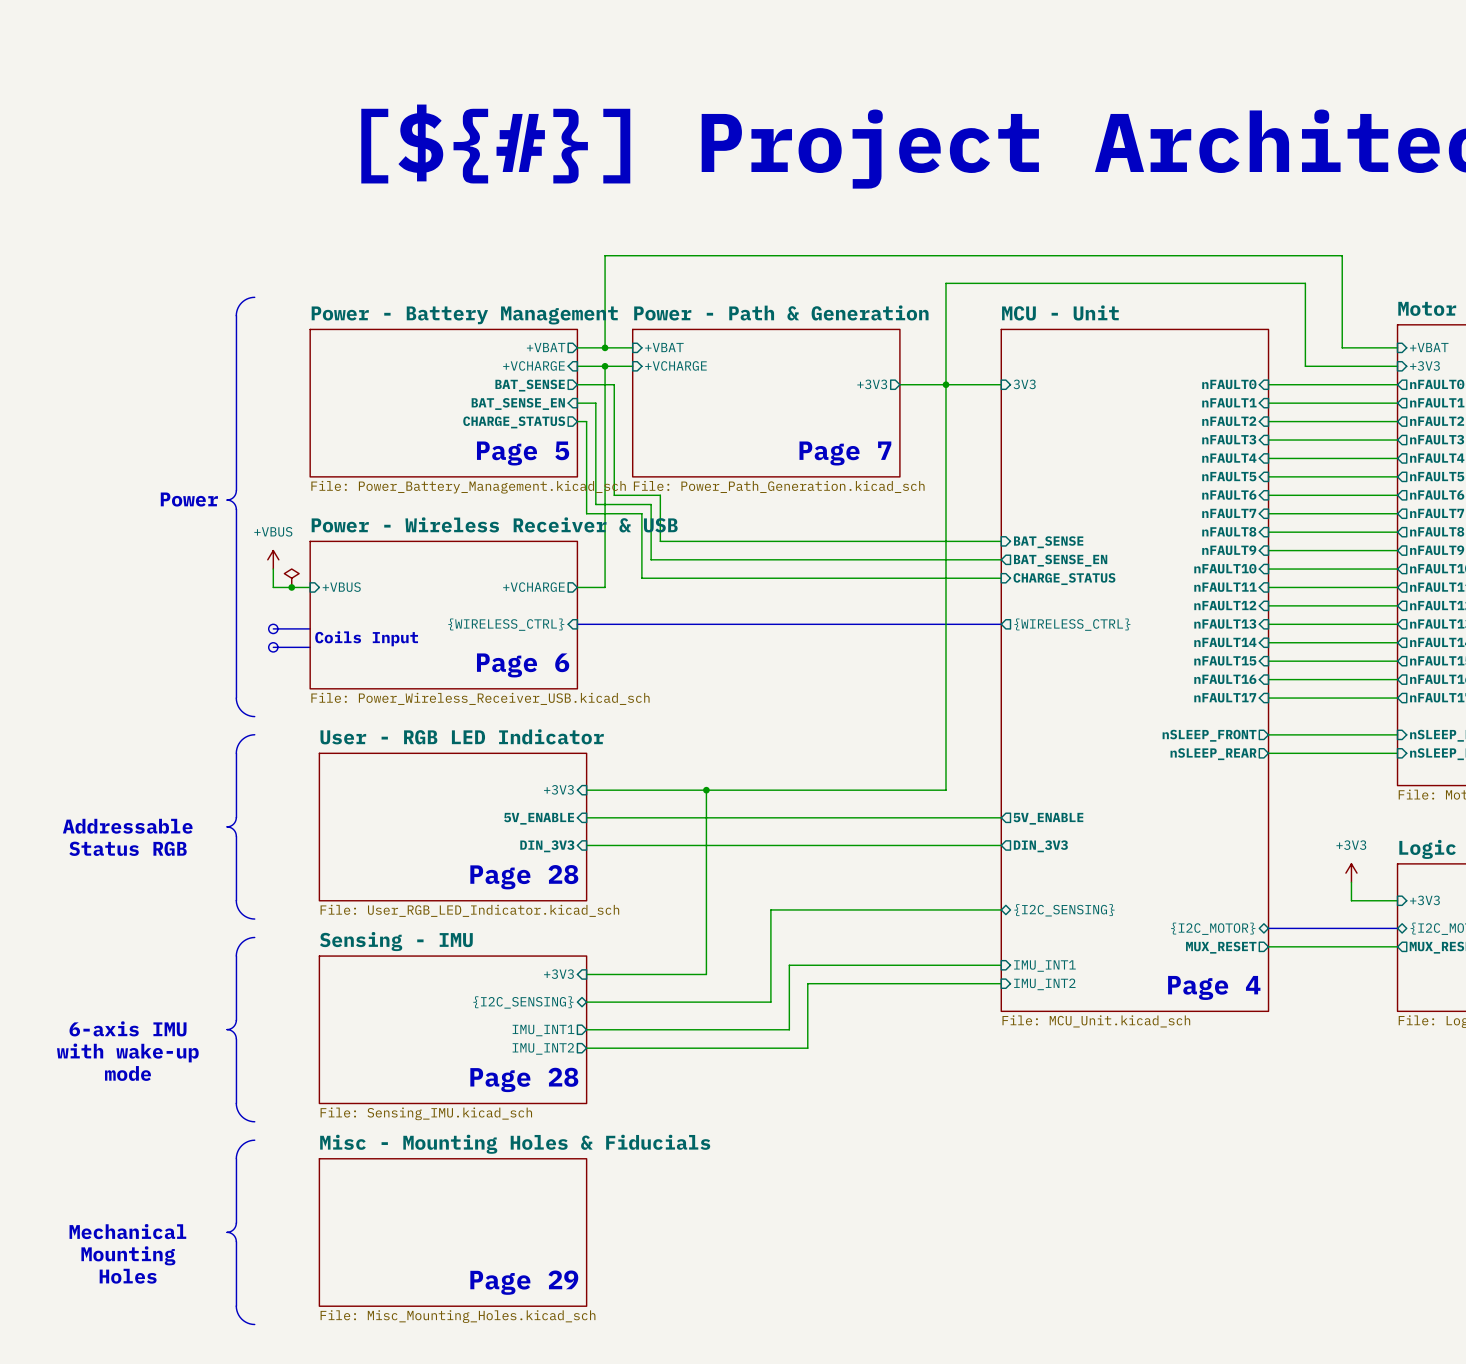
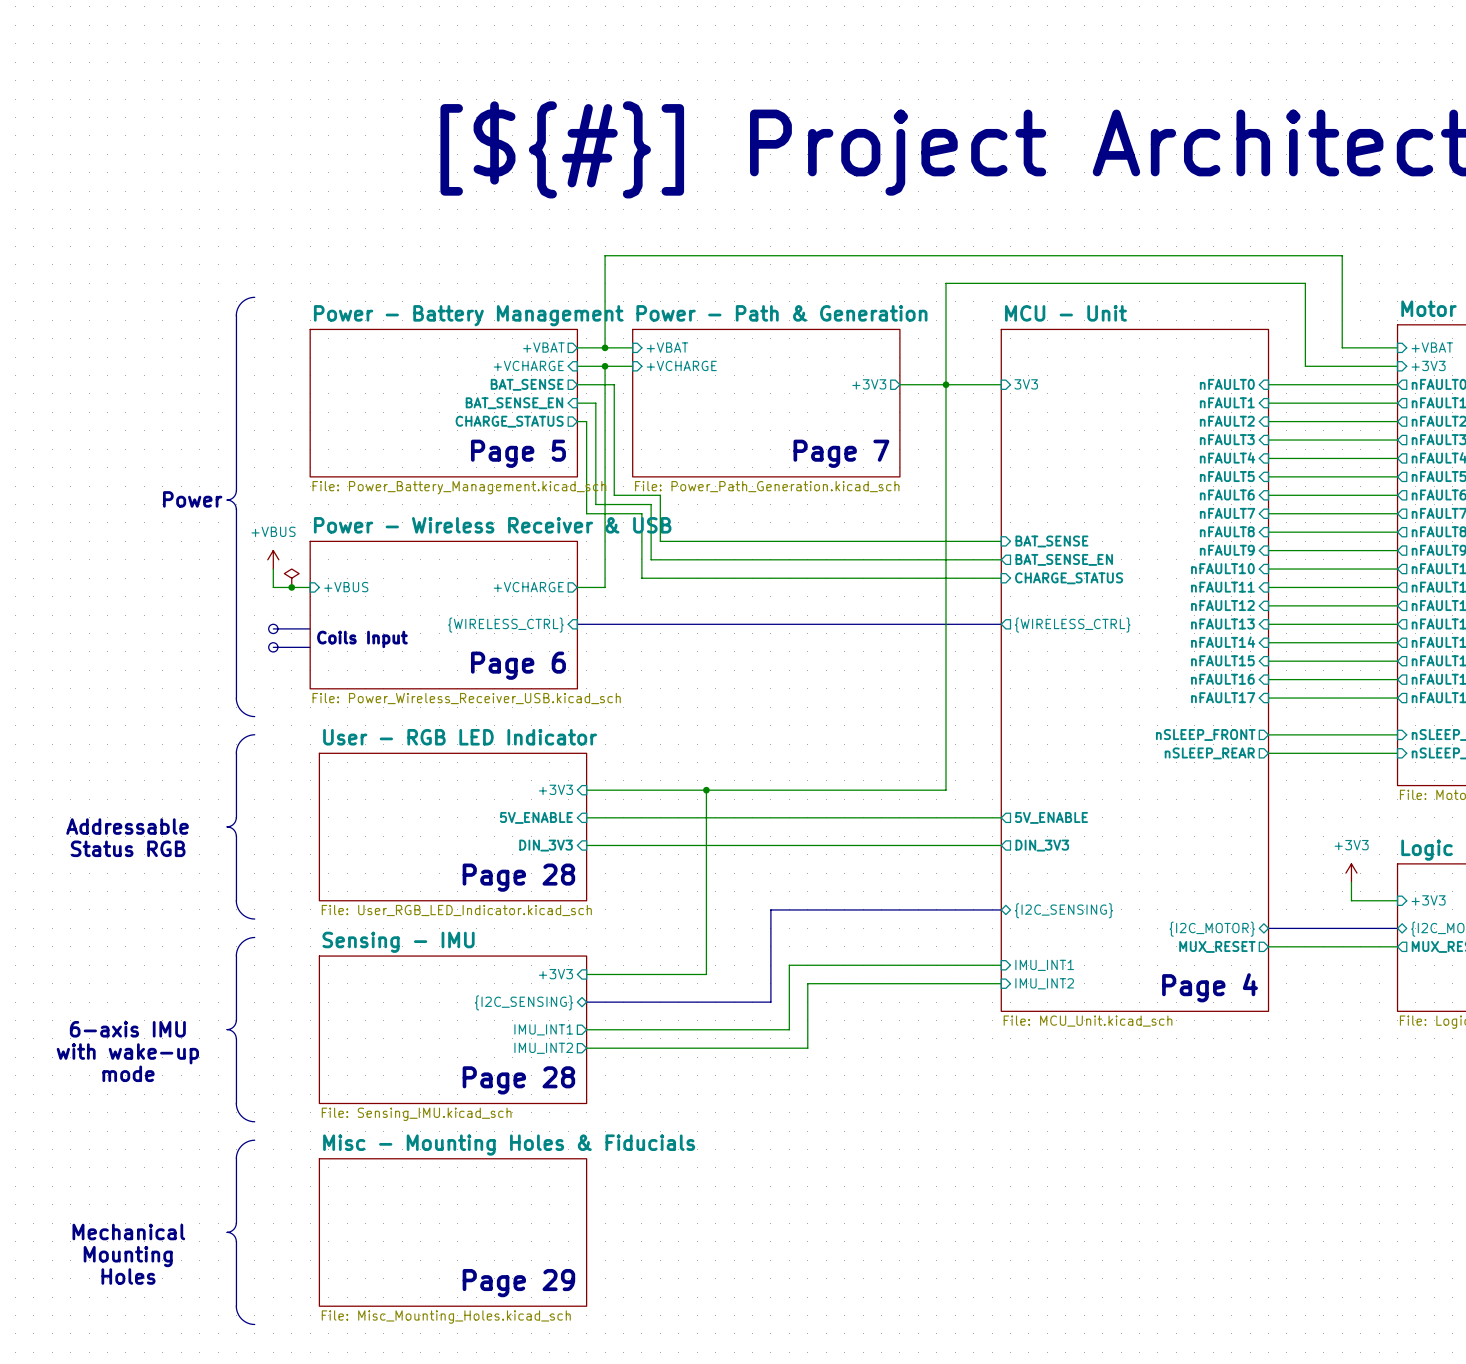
bus: none -> (1001, 909) (770, 909) (770, 1002) (586, 1002)

